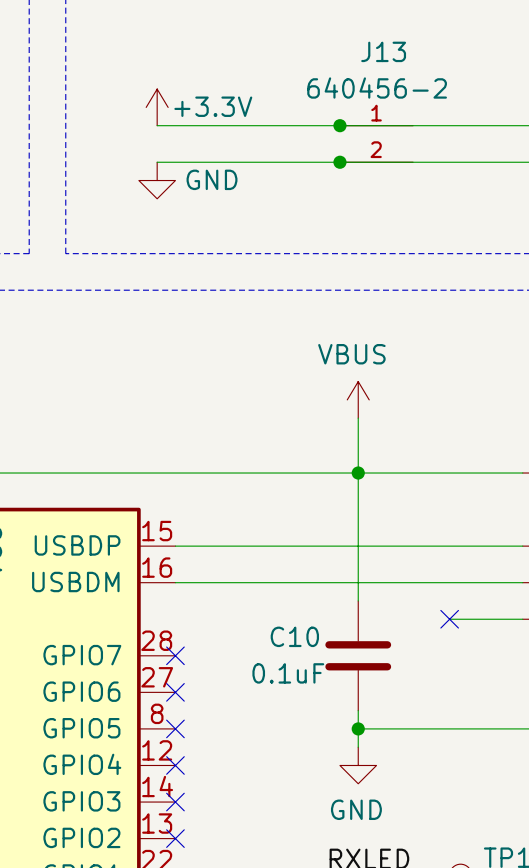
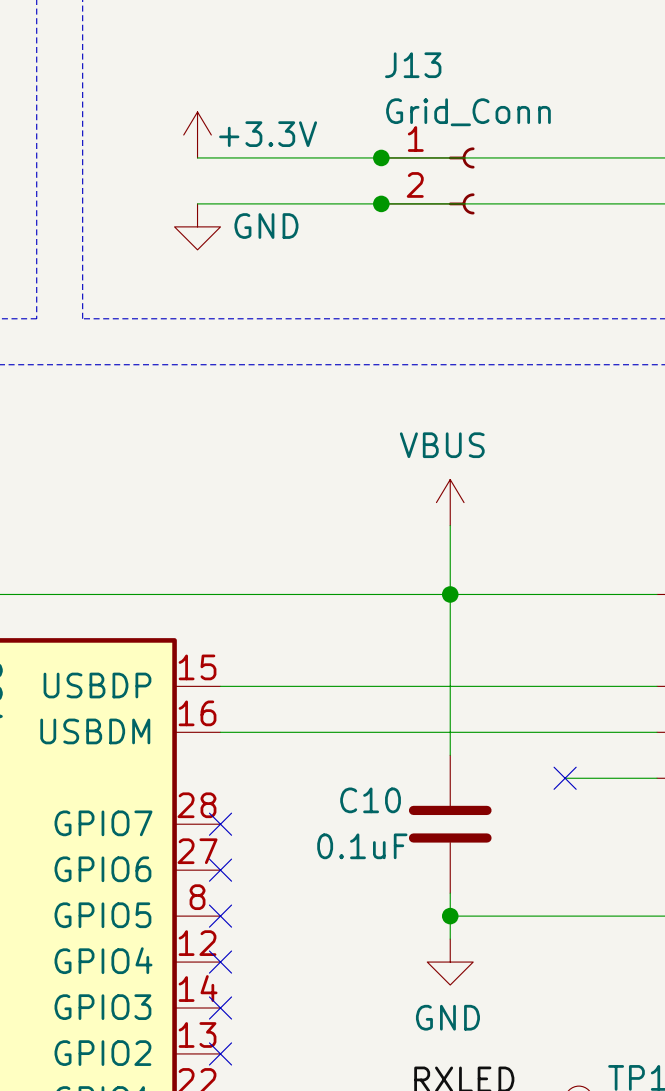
J13 value: 640456-2 (377, 88) -> Grid_Conn (468, 112)
junction: none -> (381, 157)
J13 symbol: [339, 125, 414, 163] -> [381, 147, 475, 215]
junction: (339, 125) -> none
junction: none -> (381, 203)
junction: (339, 162) -> none

